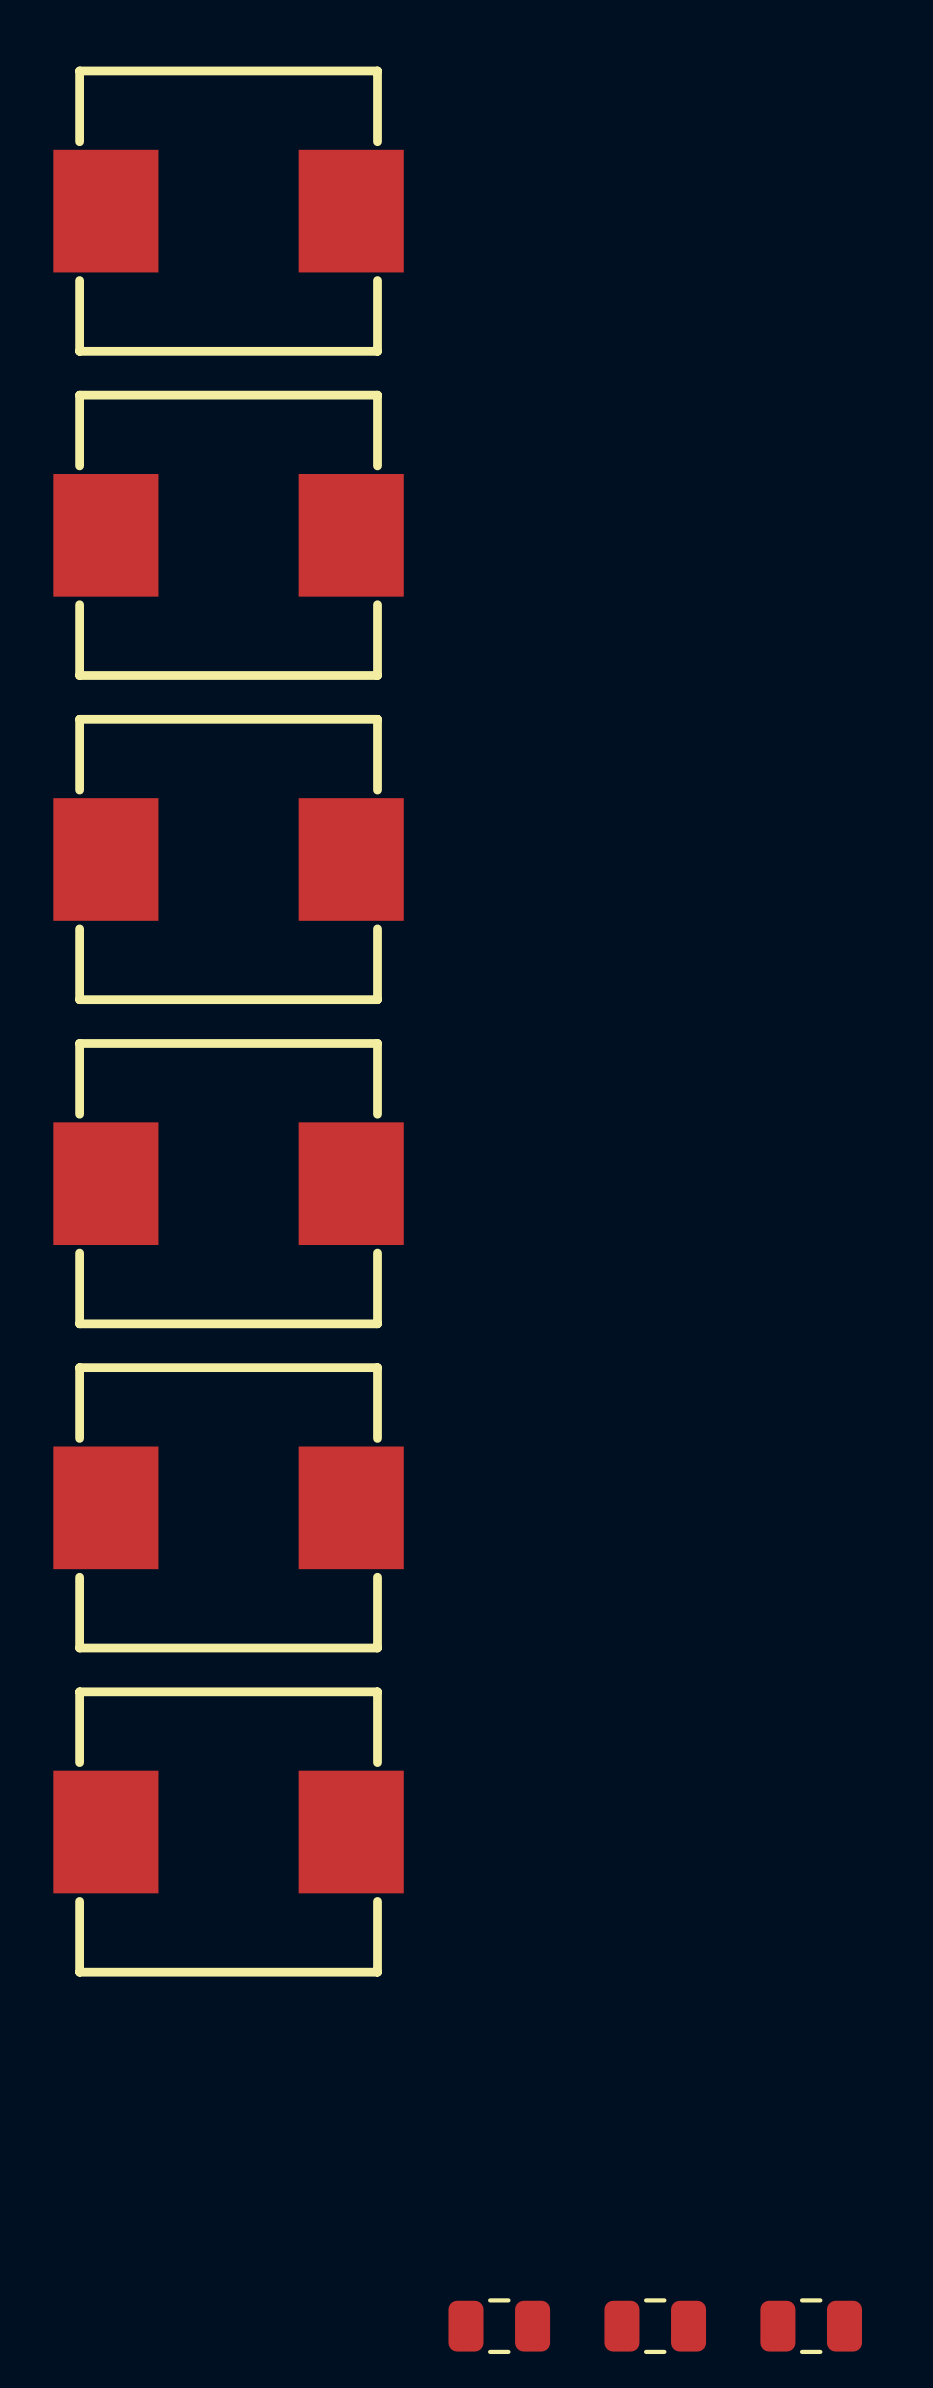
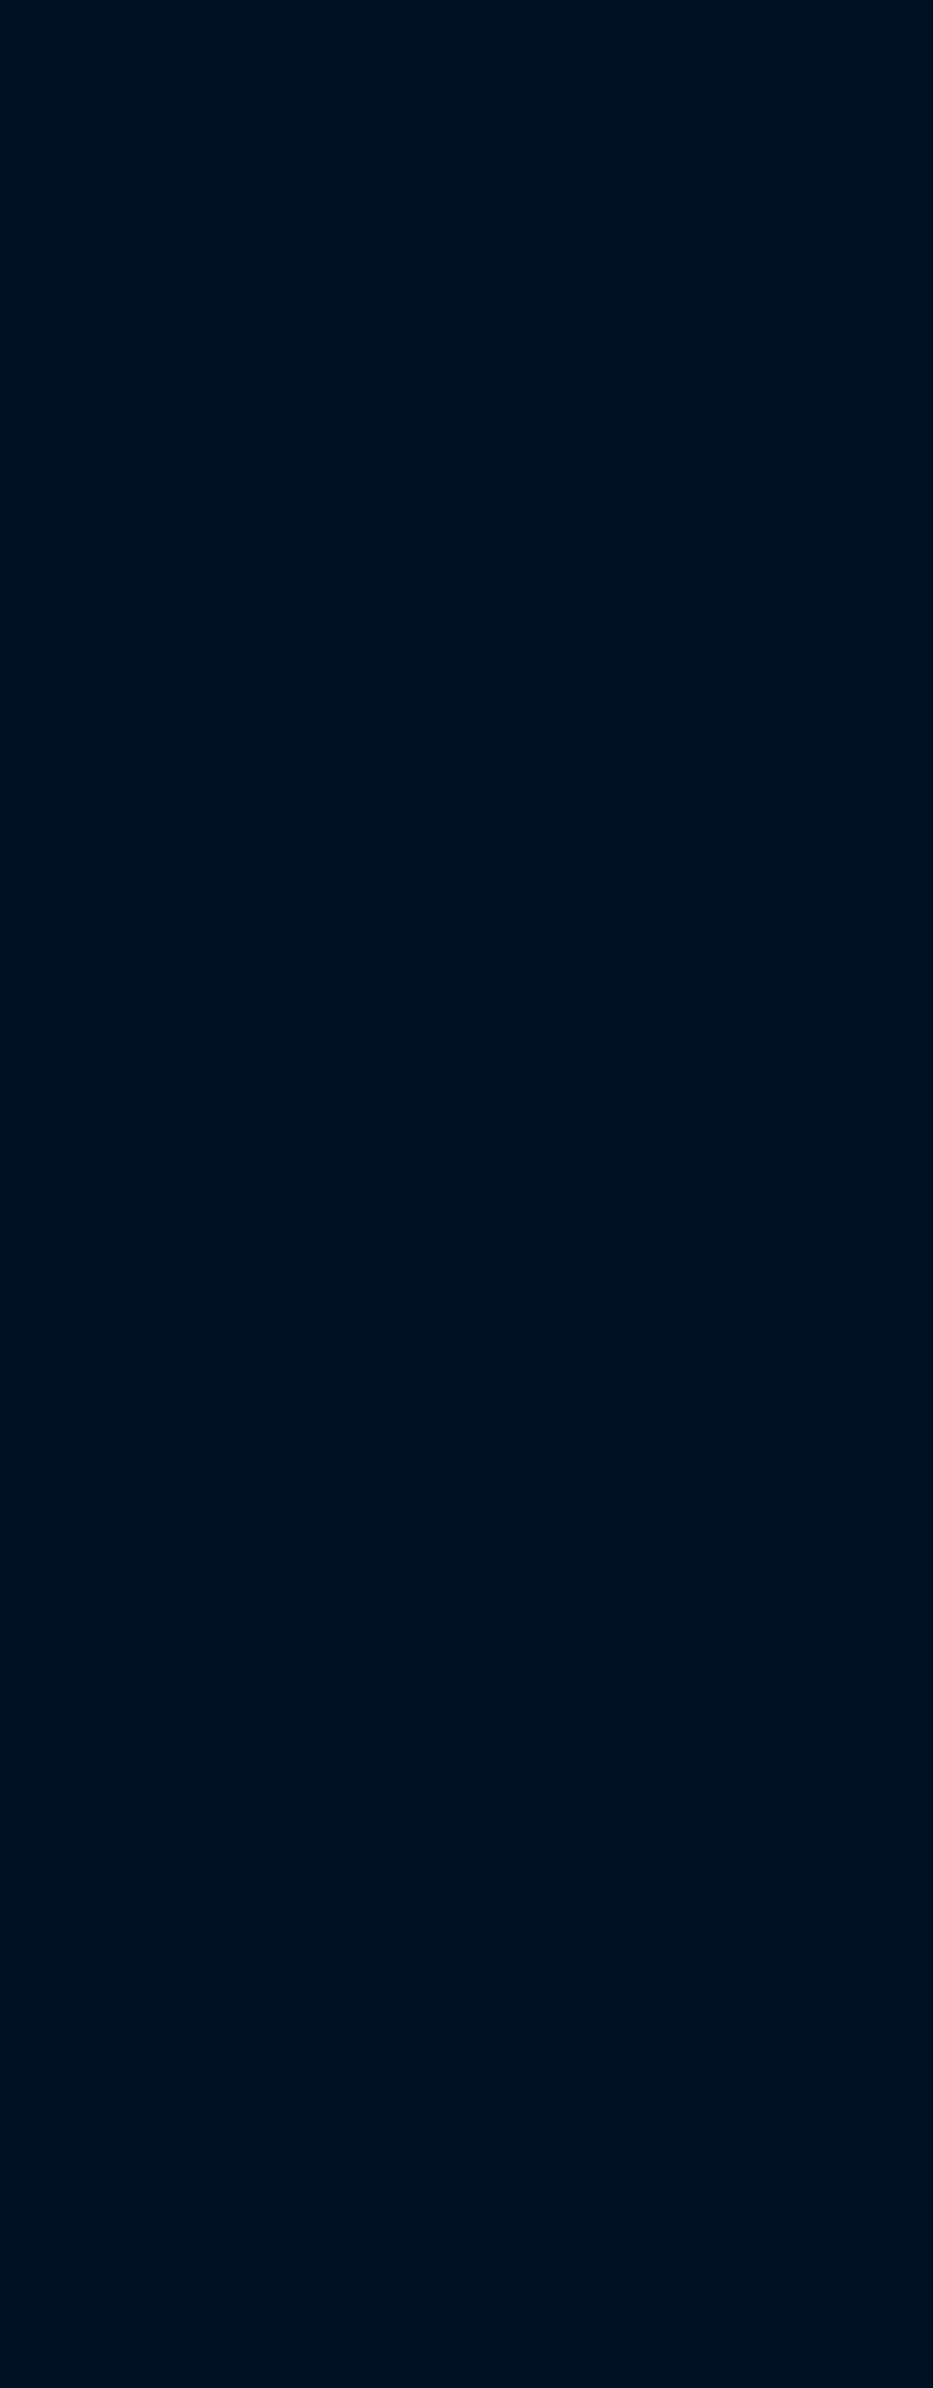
part: (228, 211) -> none
part: (228, 535) -> none
part: (228, 859) -> none
part: (228, 1183) -> none
part: (228, 1507) -> none
part: (228, 1832) -> none
part: (499, 2326) -> none
part: (655, 2326) -> none
part: (811, 2326) -> none

